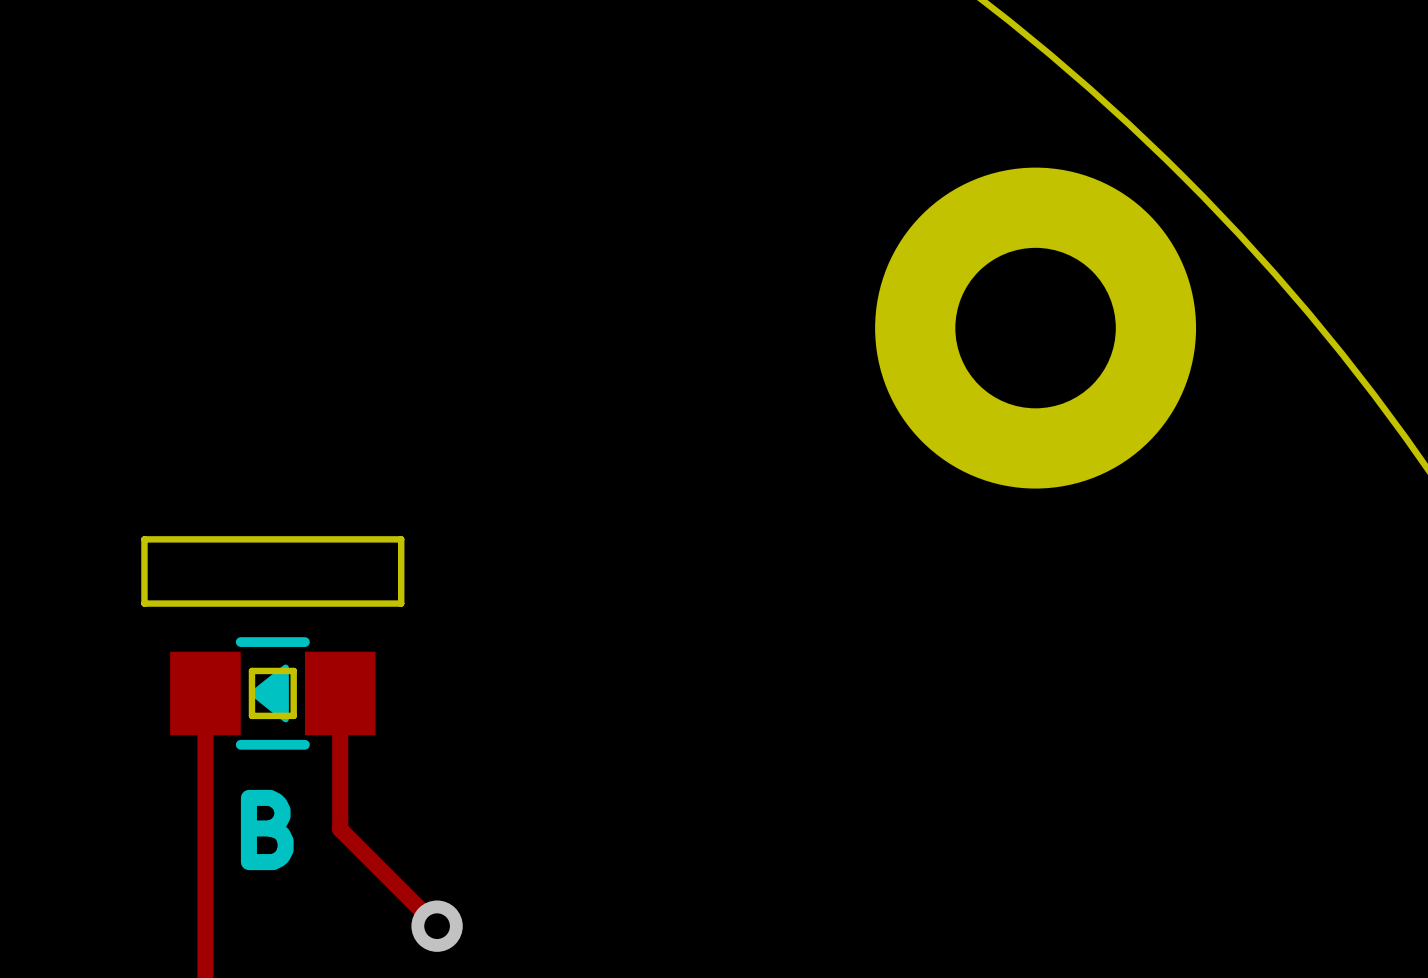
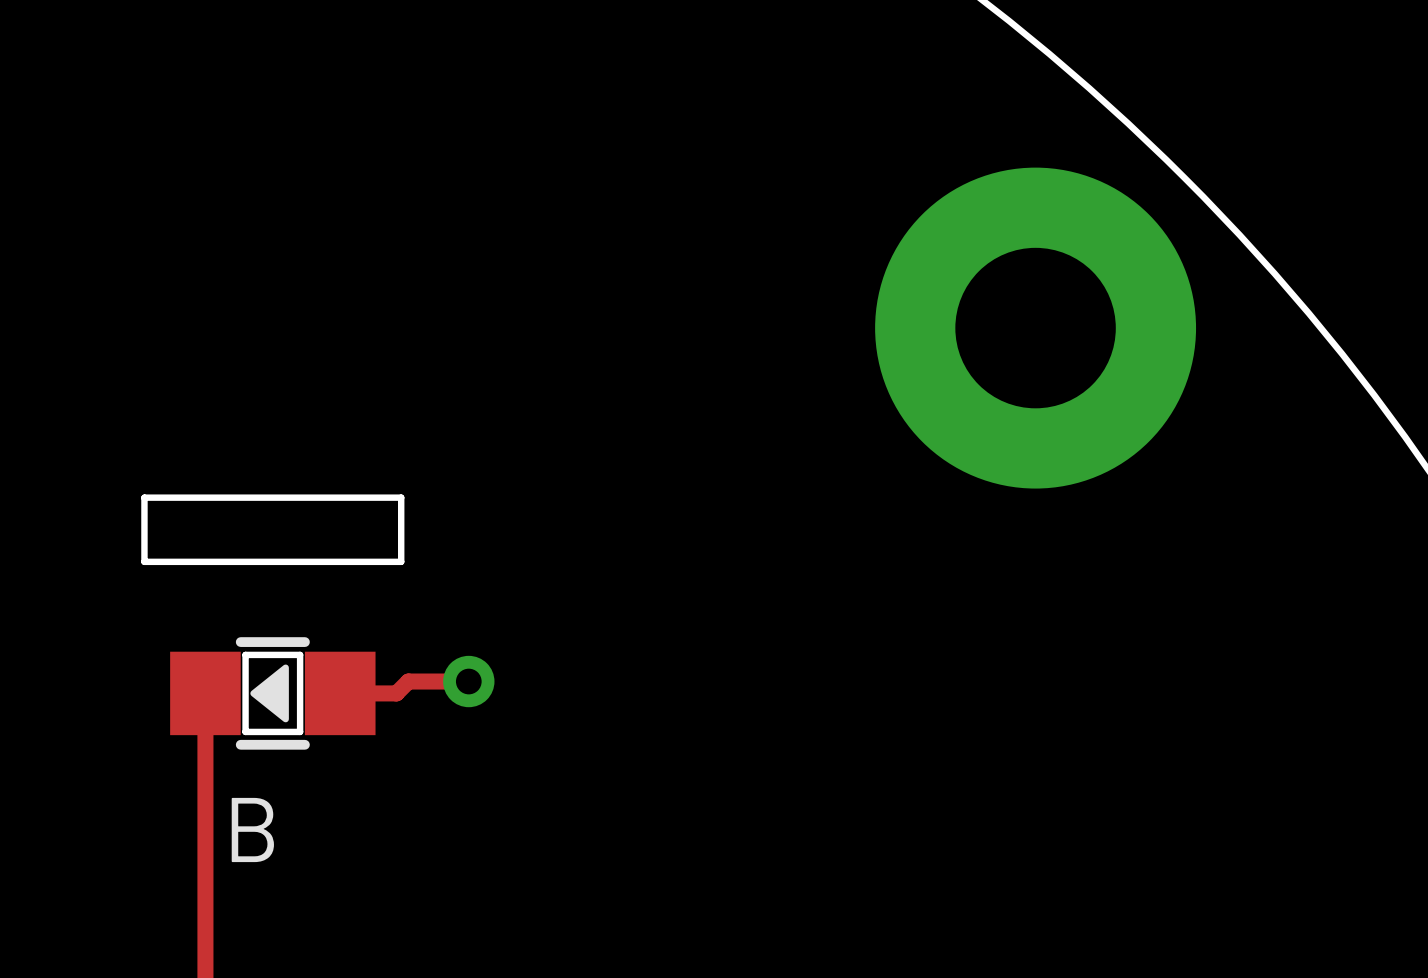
board edge: (144, 539) (401, 539) -> (144, 539) (144, 497) (401, 497) (401, 539)
board edge: (144, 561) (144, 603) (401, 603) (401, 561) -> (144, 561) (401, 561)
board edge: none -> (245, 654) (300, 654) (300, 731) (245, 731) (245, 654)
board edge: (251, 670) (293, 670) (293, 715) (251, 715) (251, 670) -> none
track: (340, 693) (340, 829) (437, 926) -> (340, 693) (396, 693) (408, 681) (468, 681)
via position: (437, 926) -> (468, 681)

